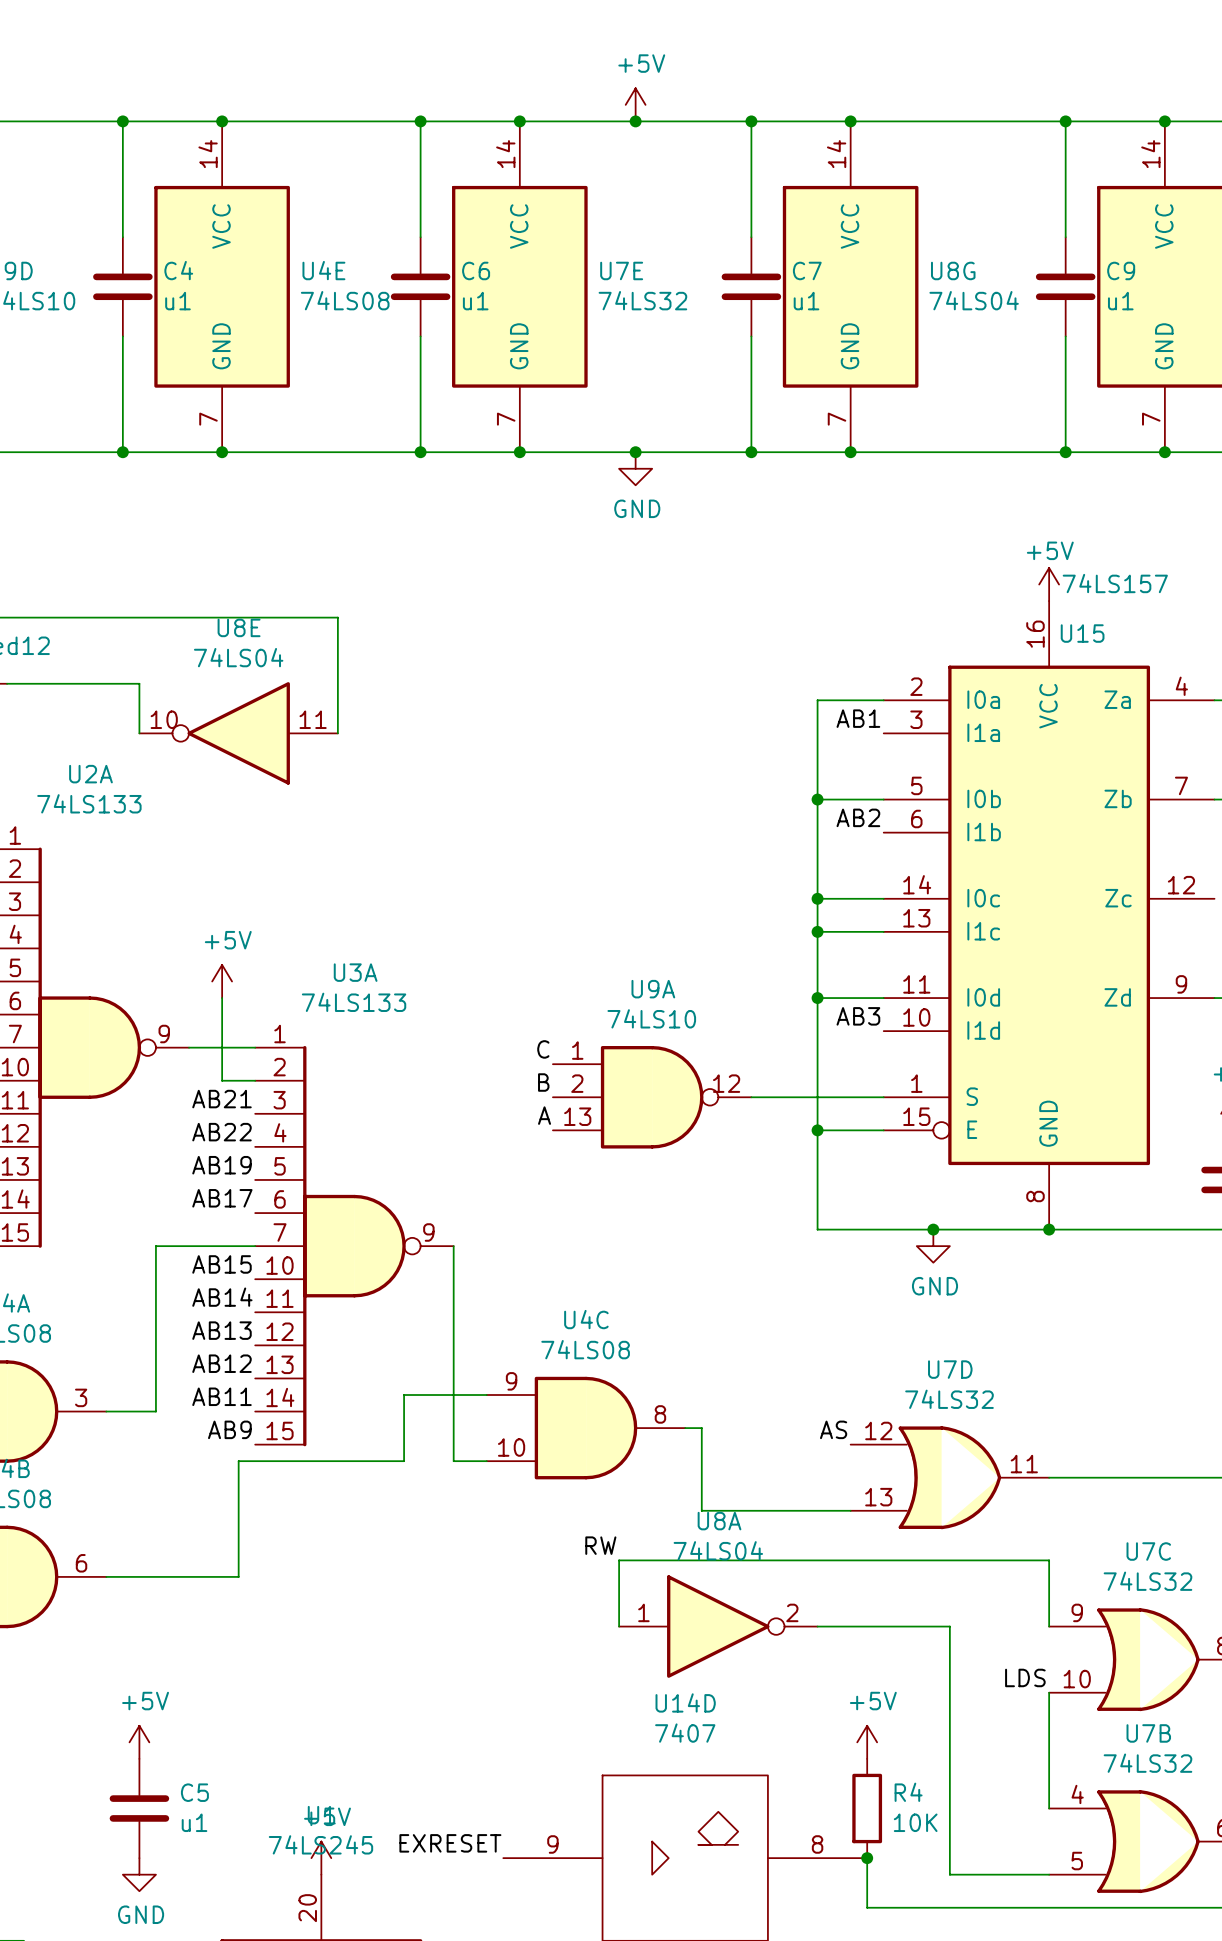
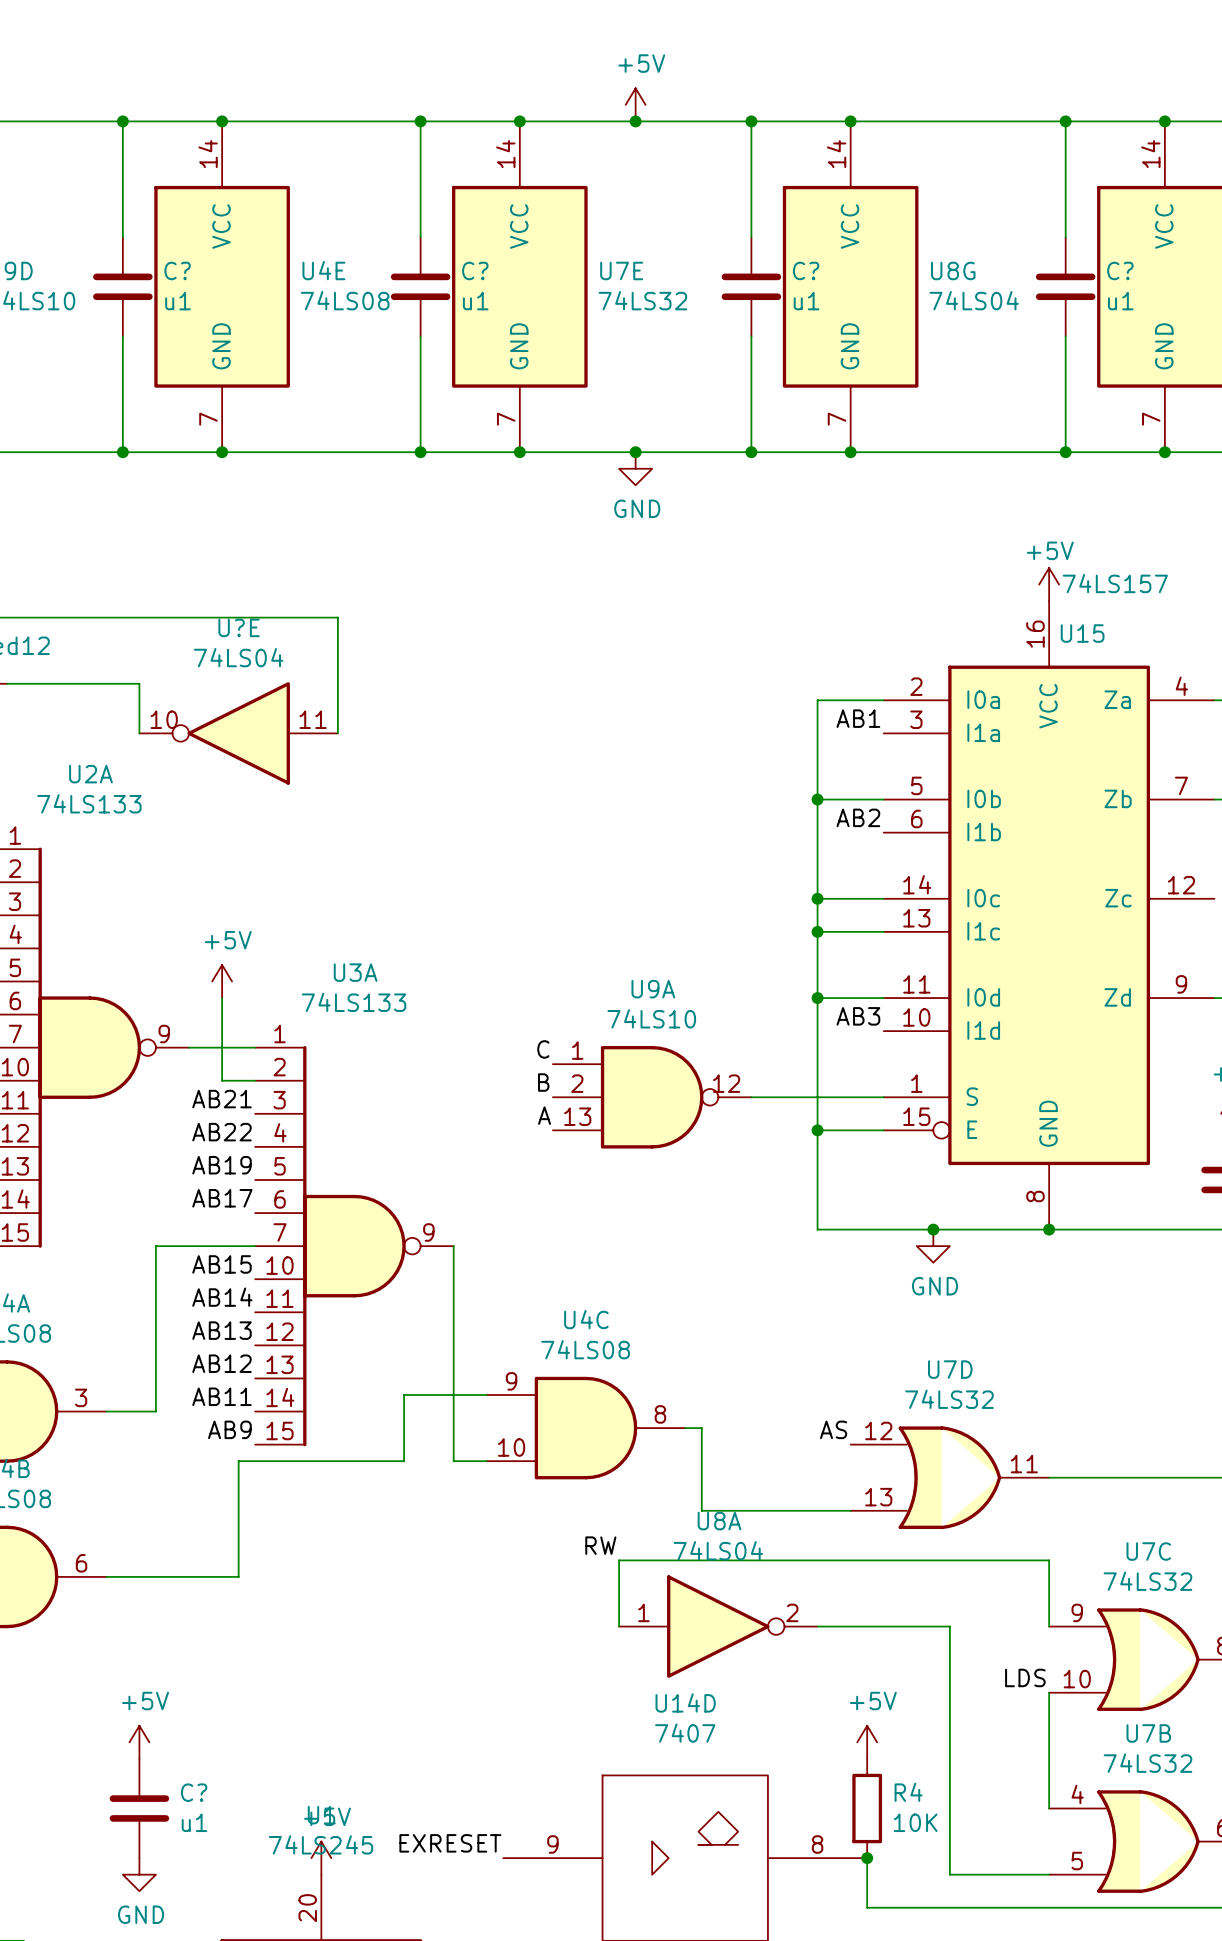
C4 name: C4 (178, 270) -> C? (177, 270)
C6 name: C6 (476, 270) -> C? (475, 270)
C7 name: C7 (807, 270) -> C? (806, 270)
C9 name: C9 (1121, 270) -> C? (1120, 270)
U8E name: U8E (239, 627) -> U?E (239, 627)
C5 name: C5 (194, 1792) -> C? (194, 1792)

